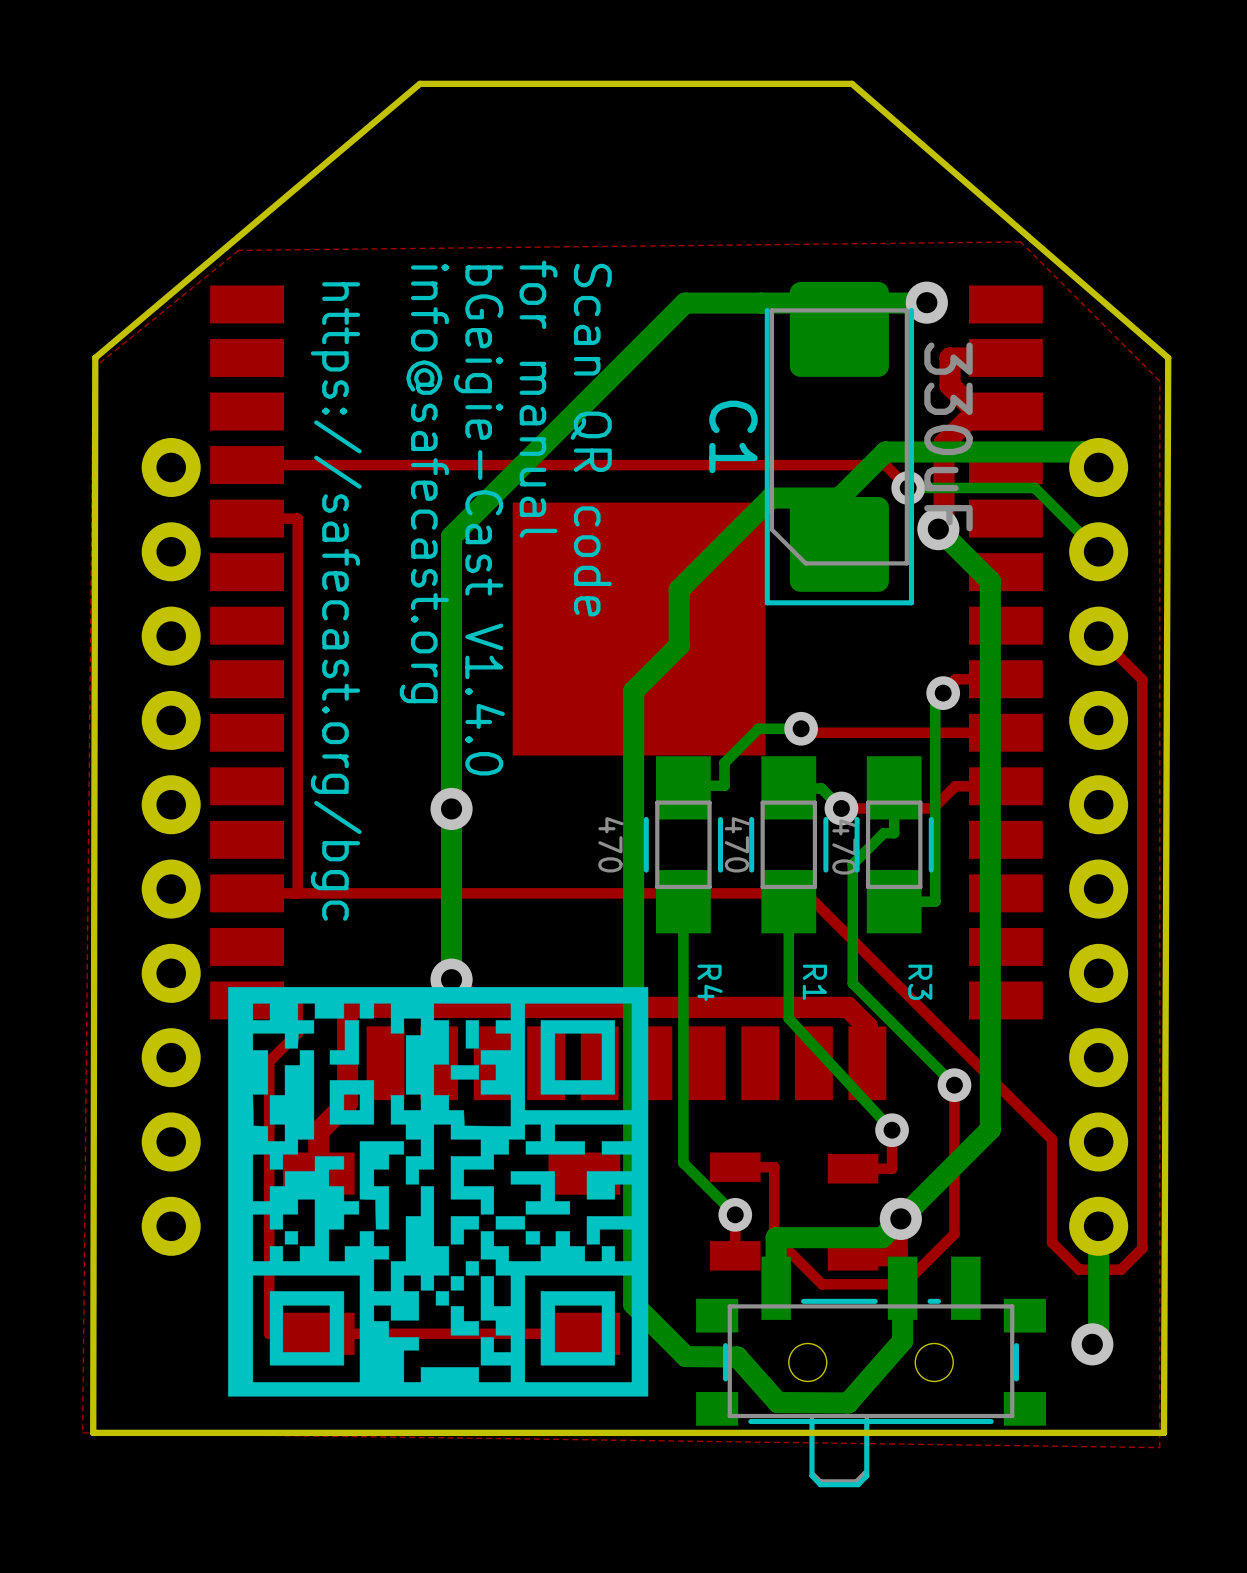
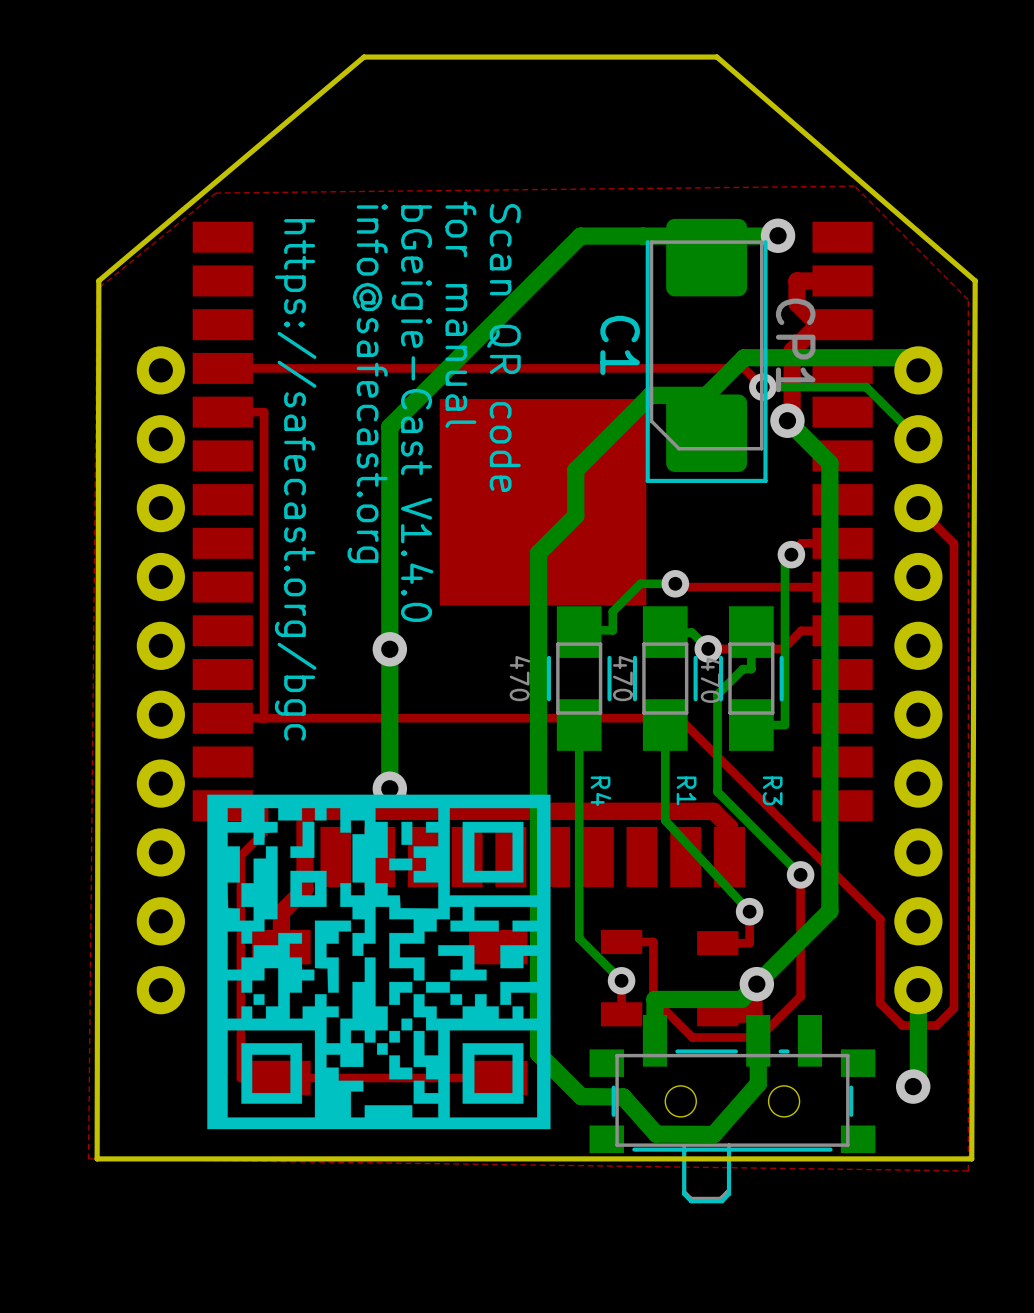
C1 value: 330uF (948, 436) -> CP1 (795, 345)

